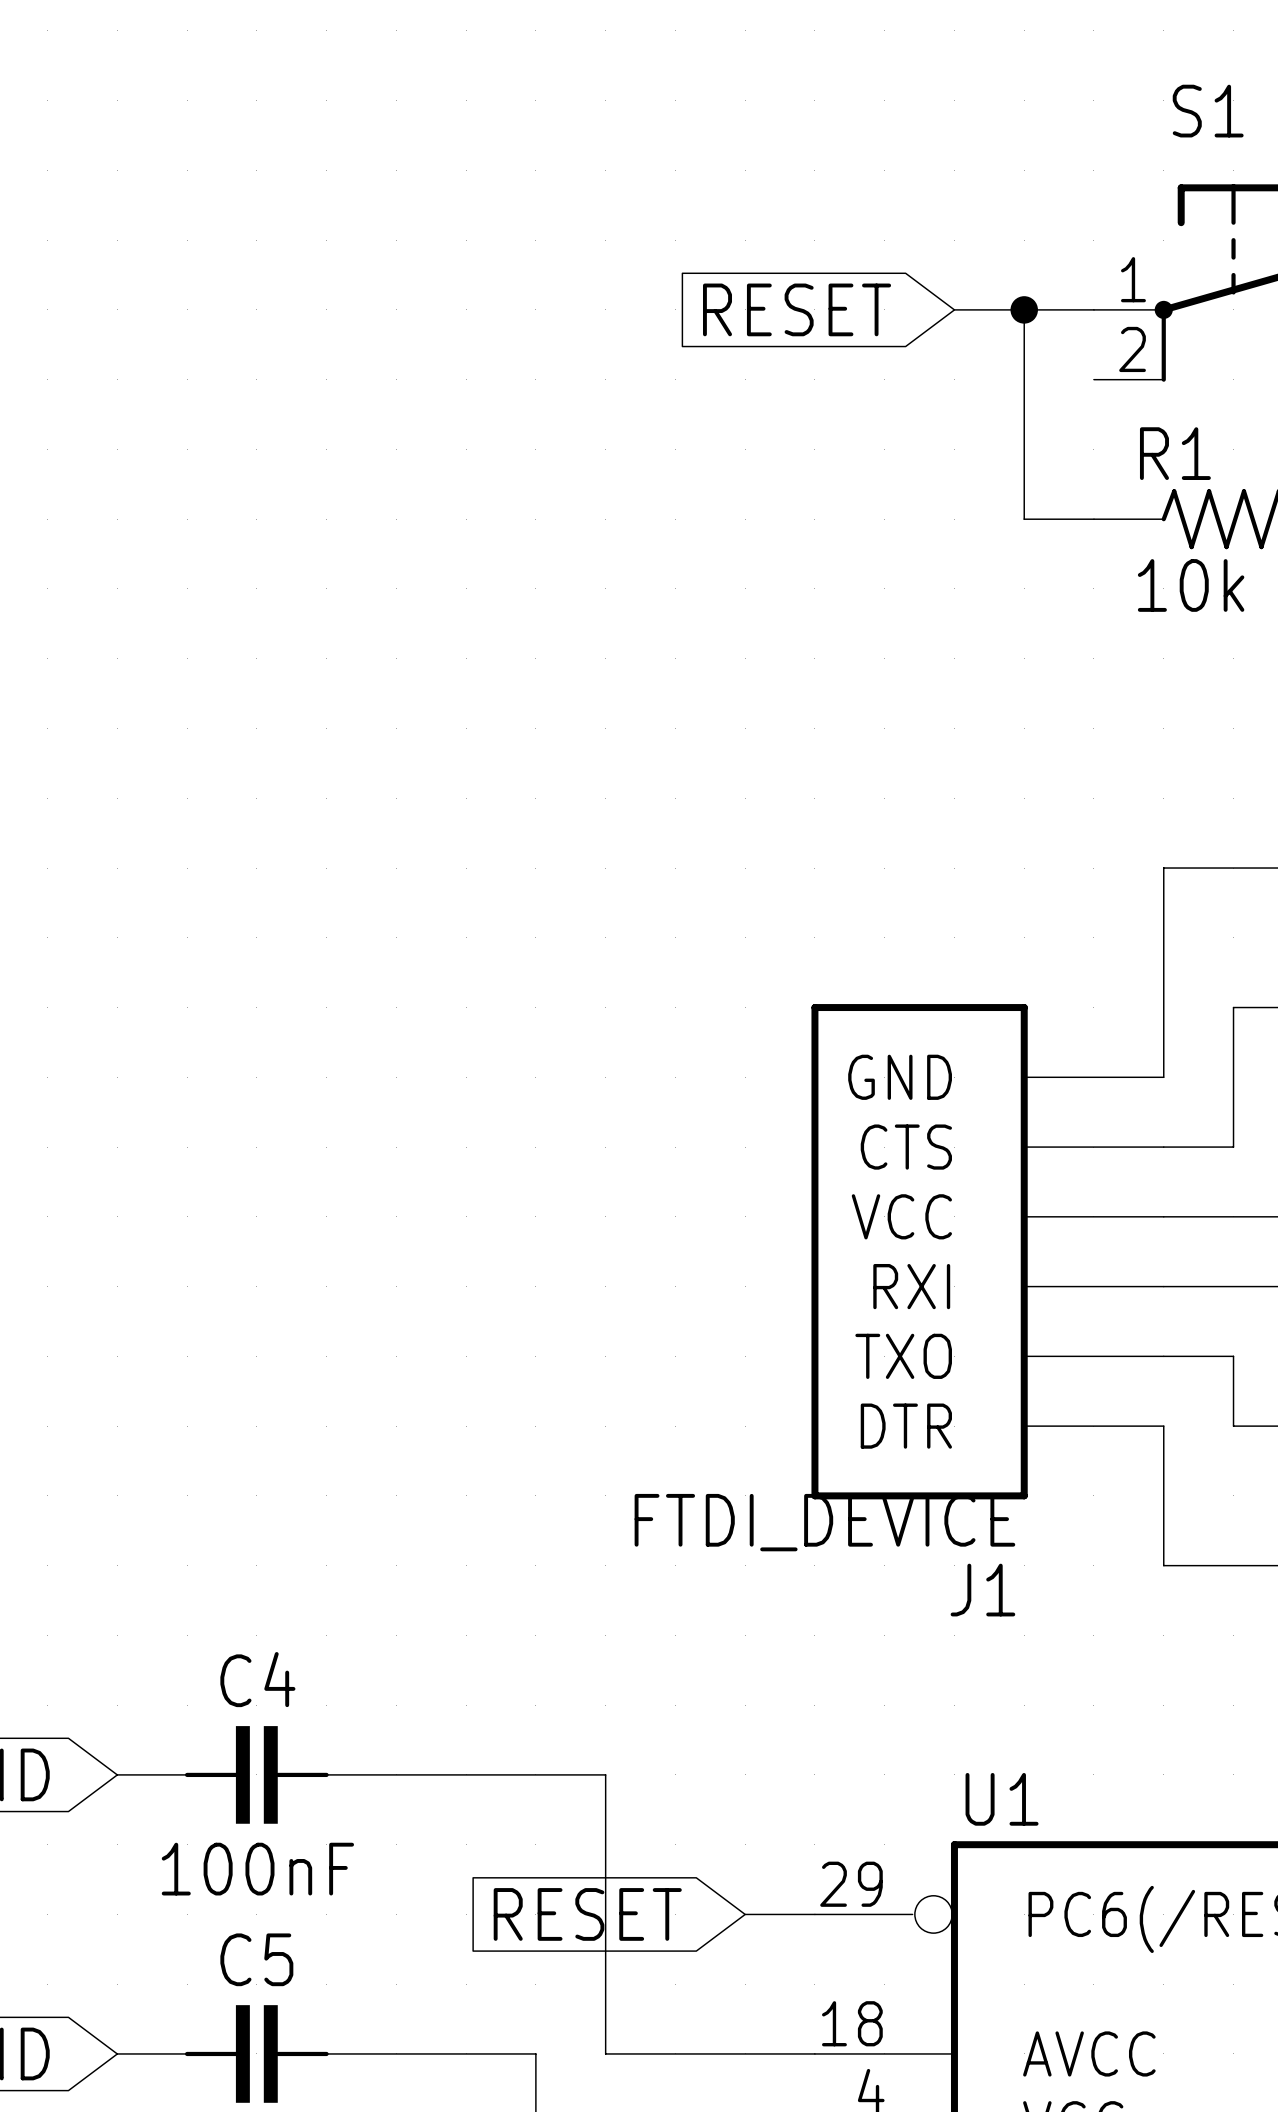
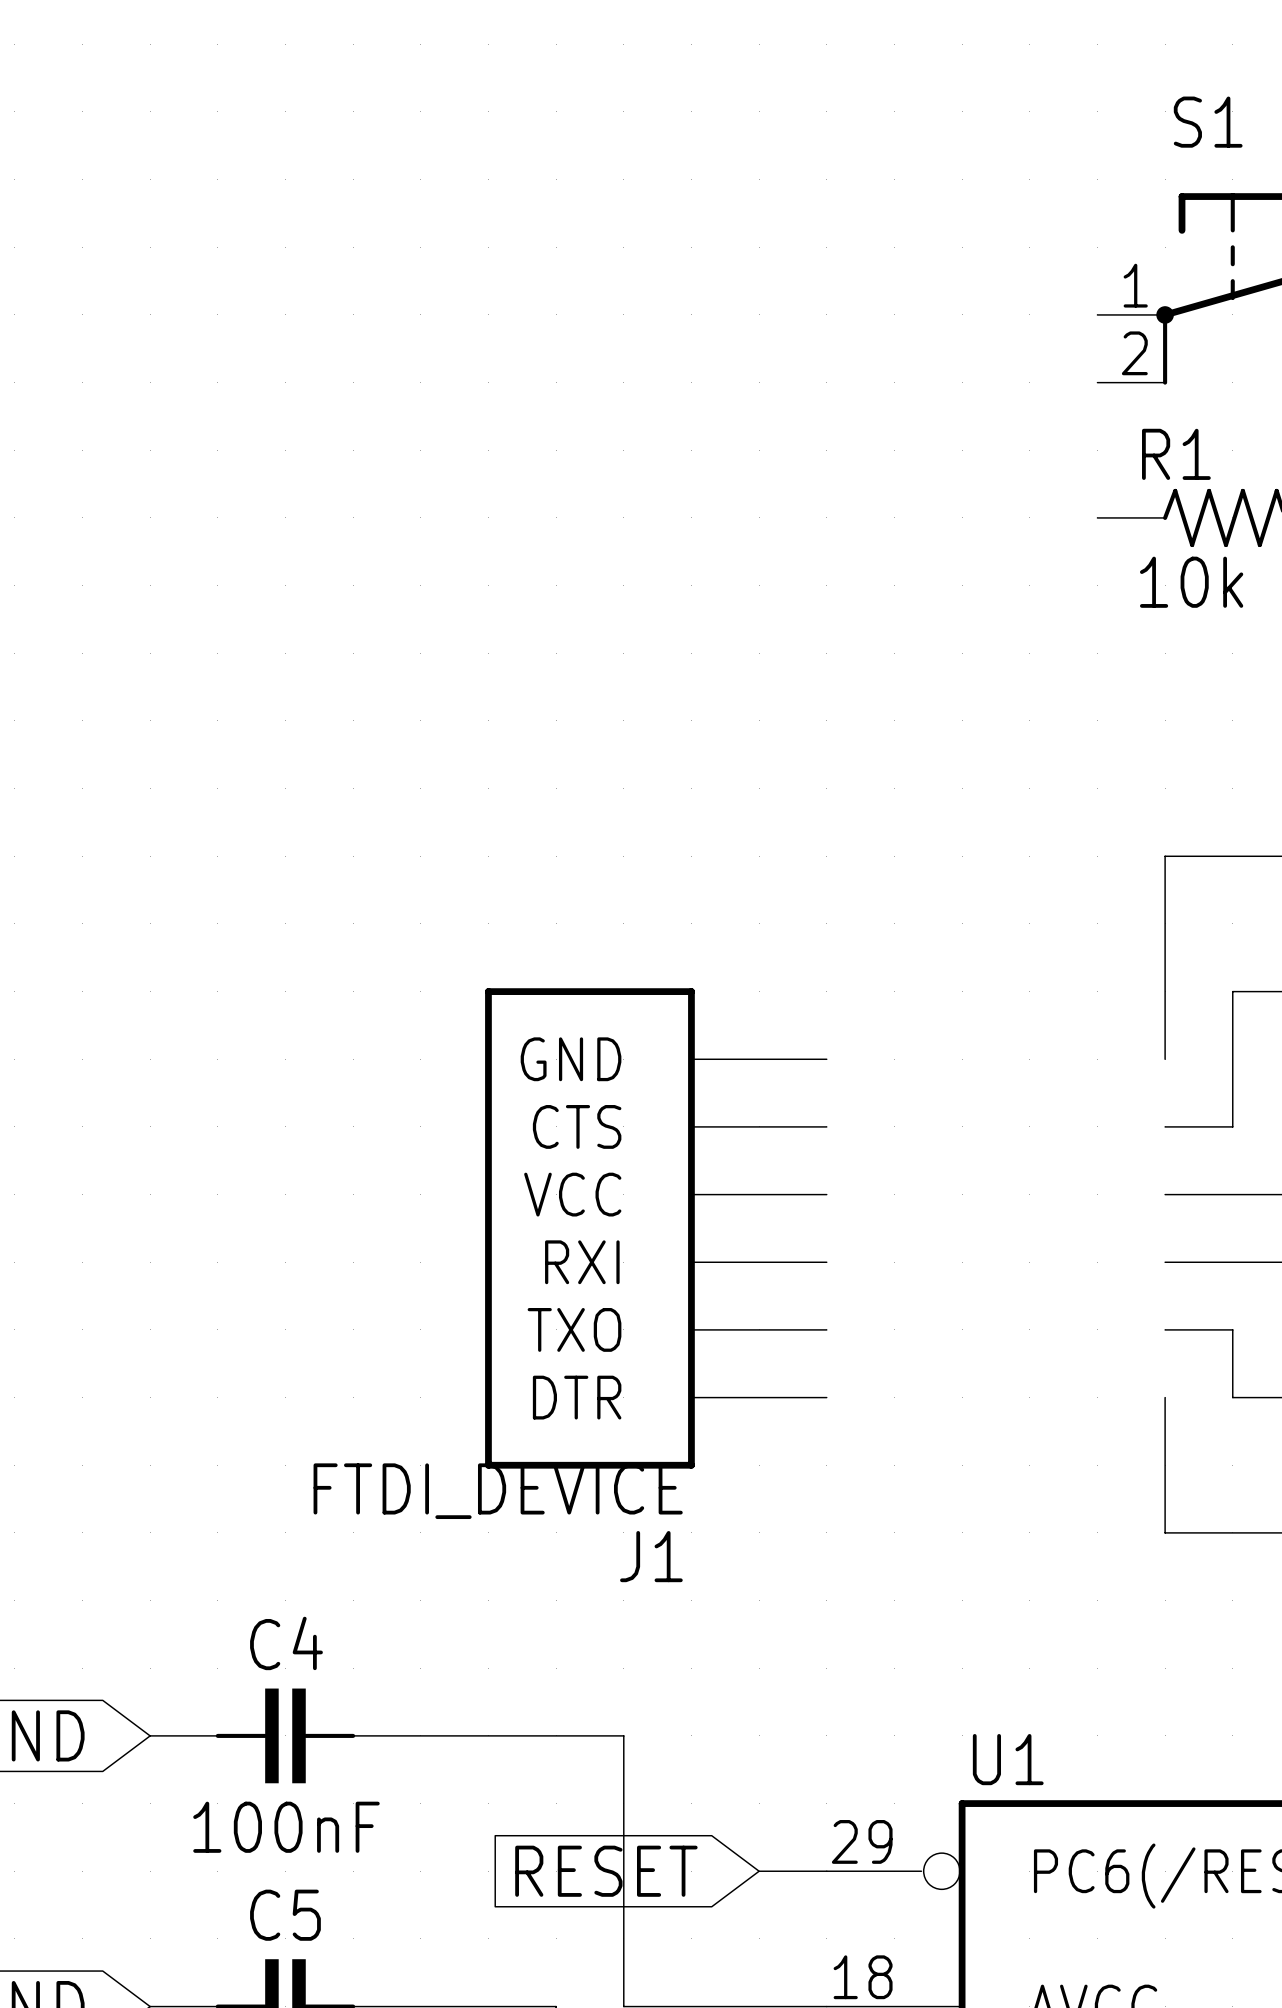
global label: RESET (797, 309) -> none
wire: (954, 309) (1093, 309) -> none
wire: (1024, 309) (1024, 519) (1093, 519) -> none
junction: (1024, 309) -> none
J1 position: (987, 1251) -> (655, 1228)

